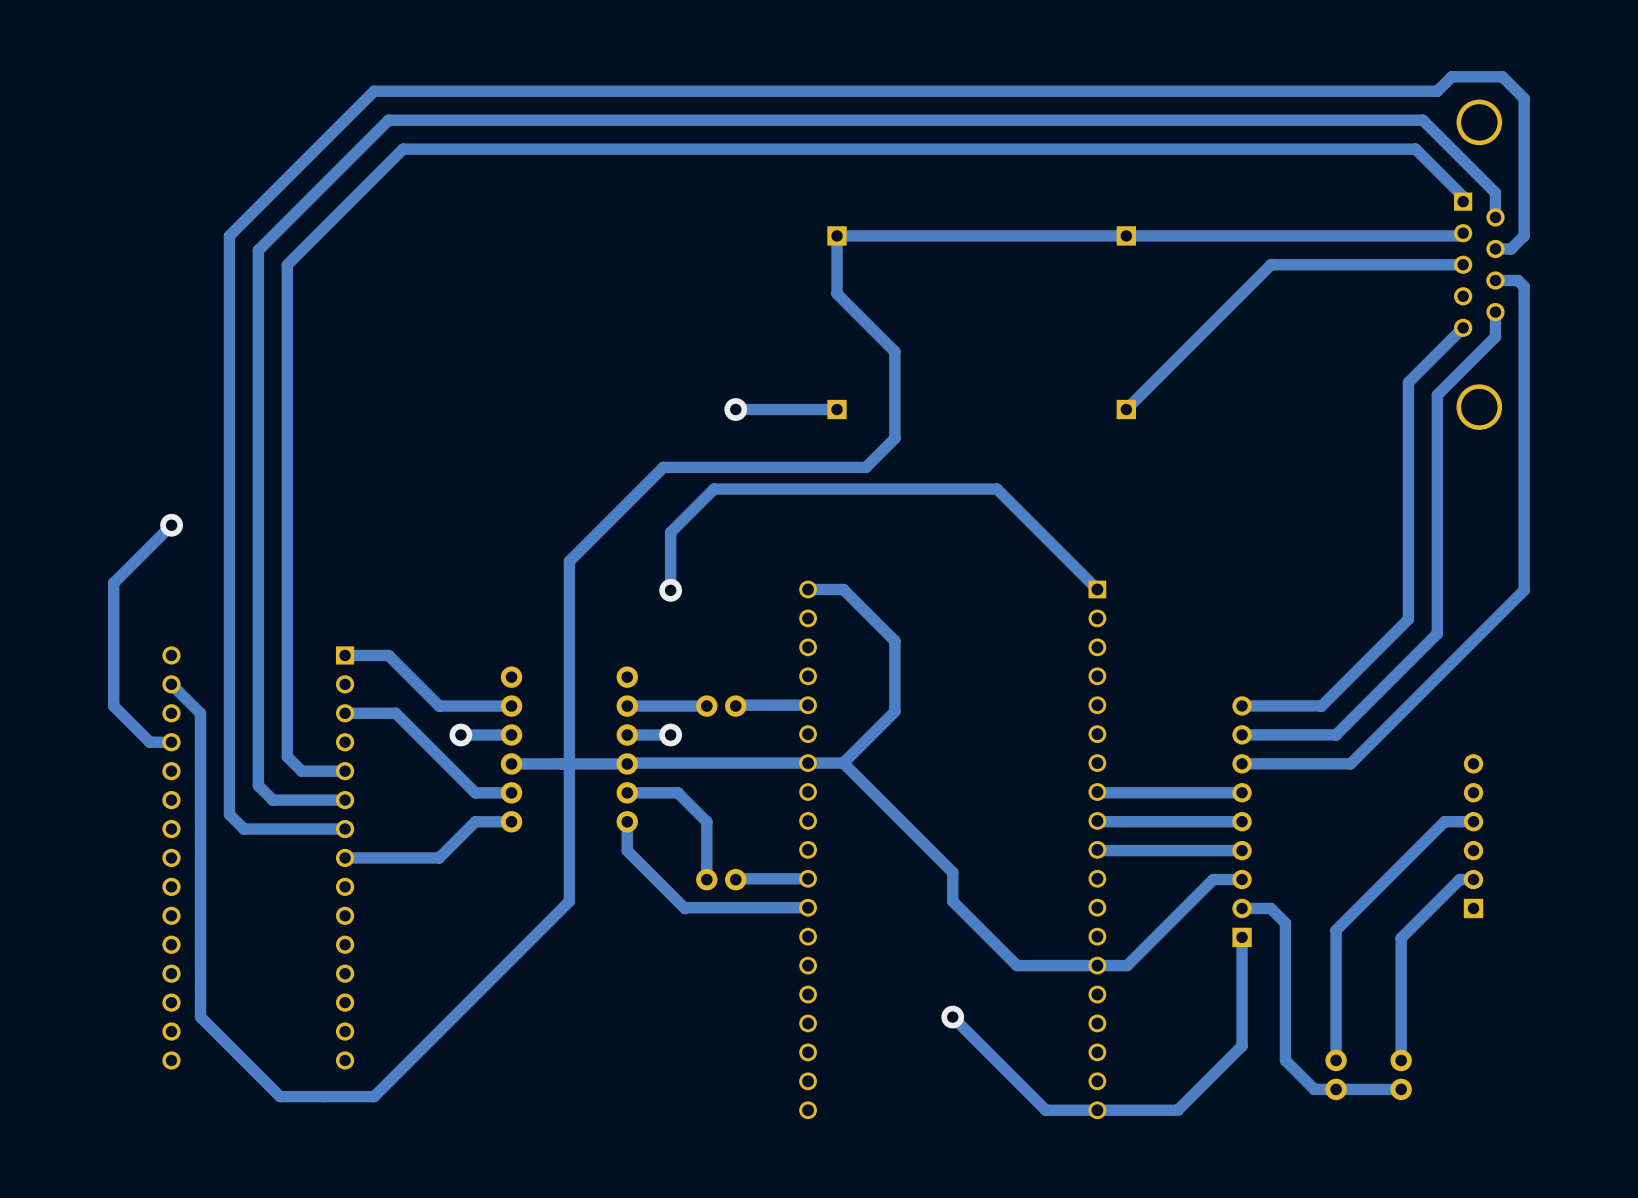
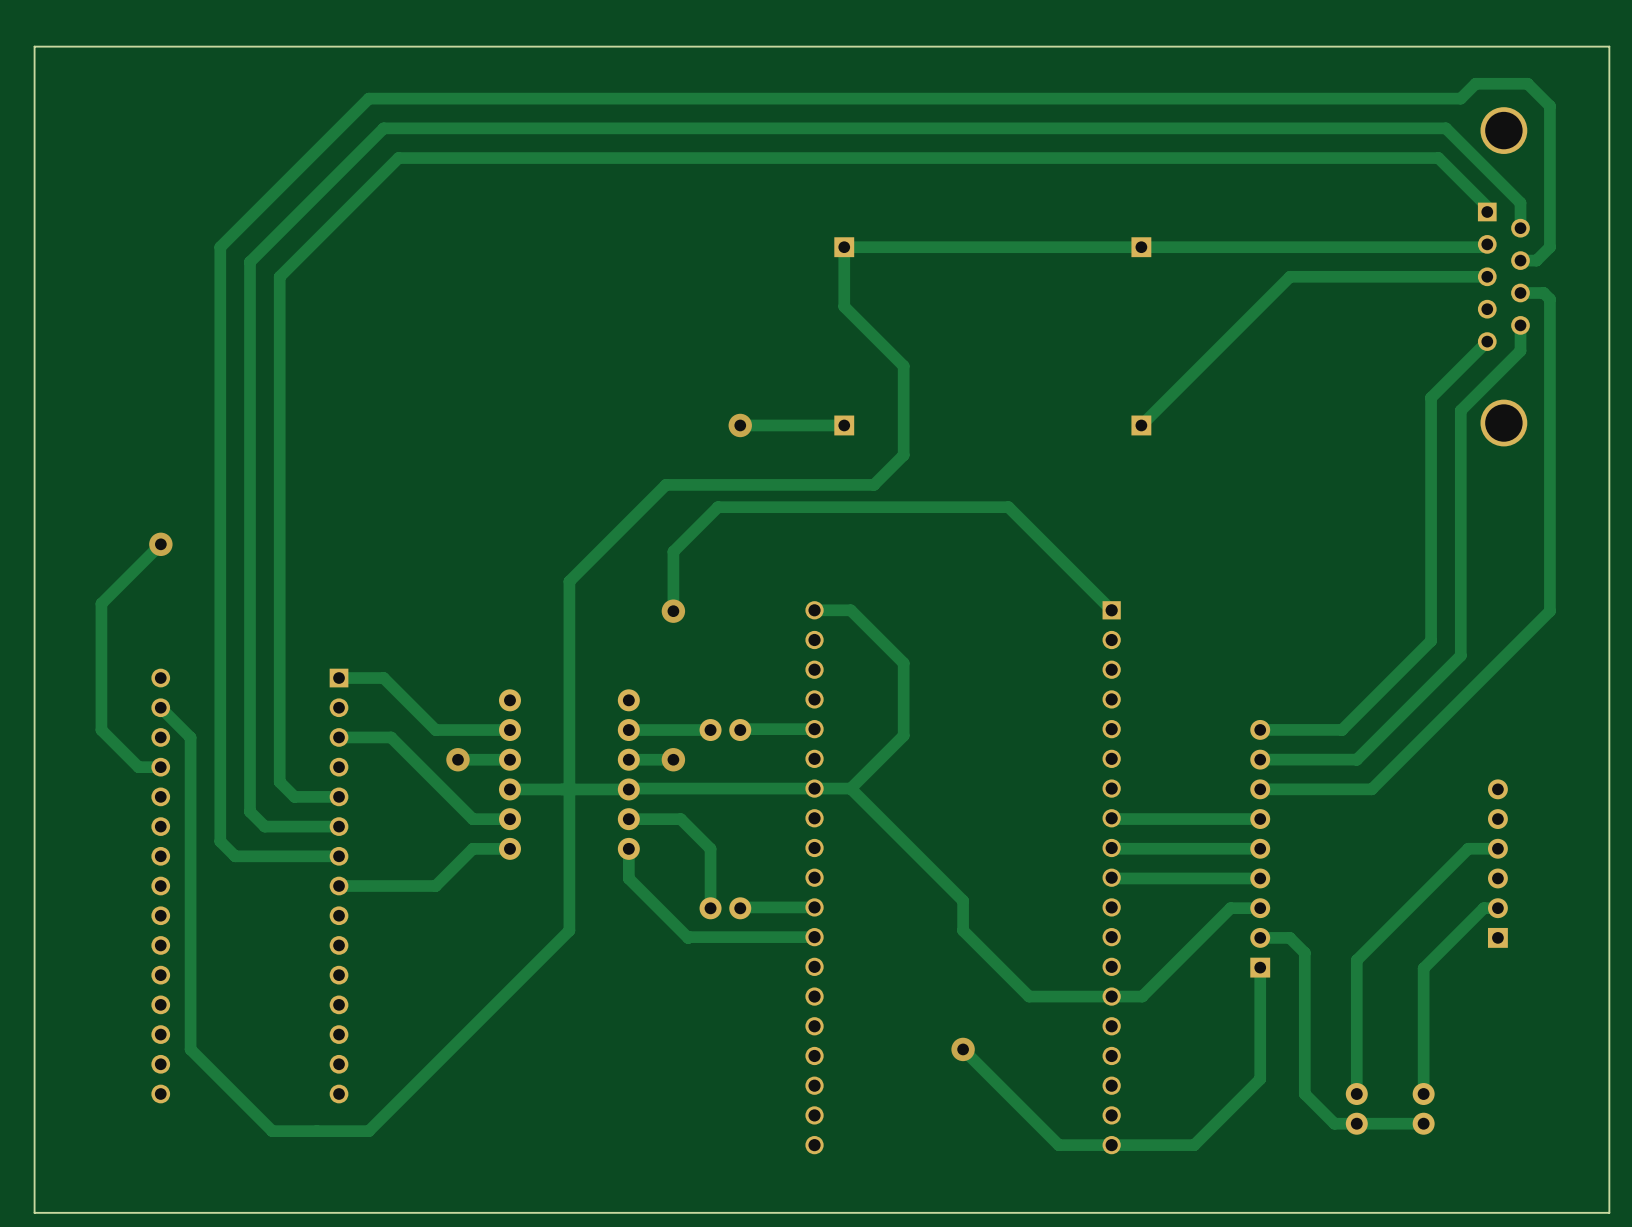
board edge: none -> (1609, 46) (34, 46) (34, 1212) (1609, 1212) (1609, 46)

